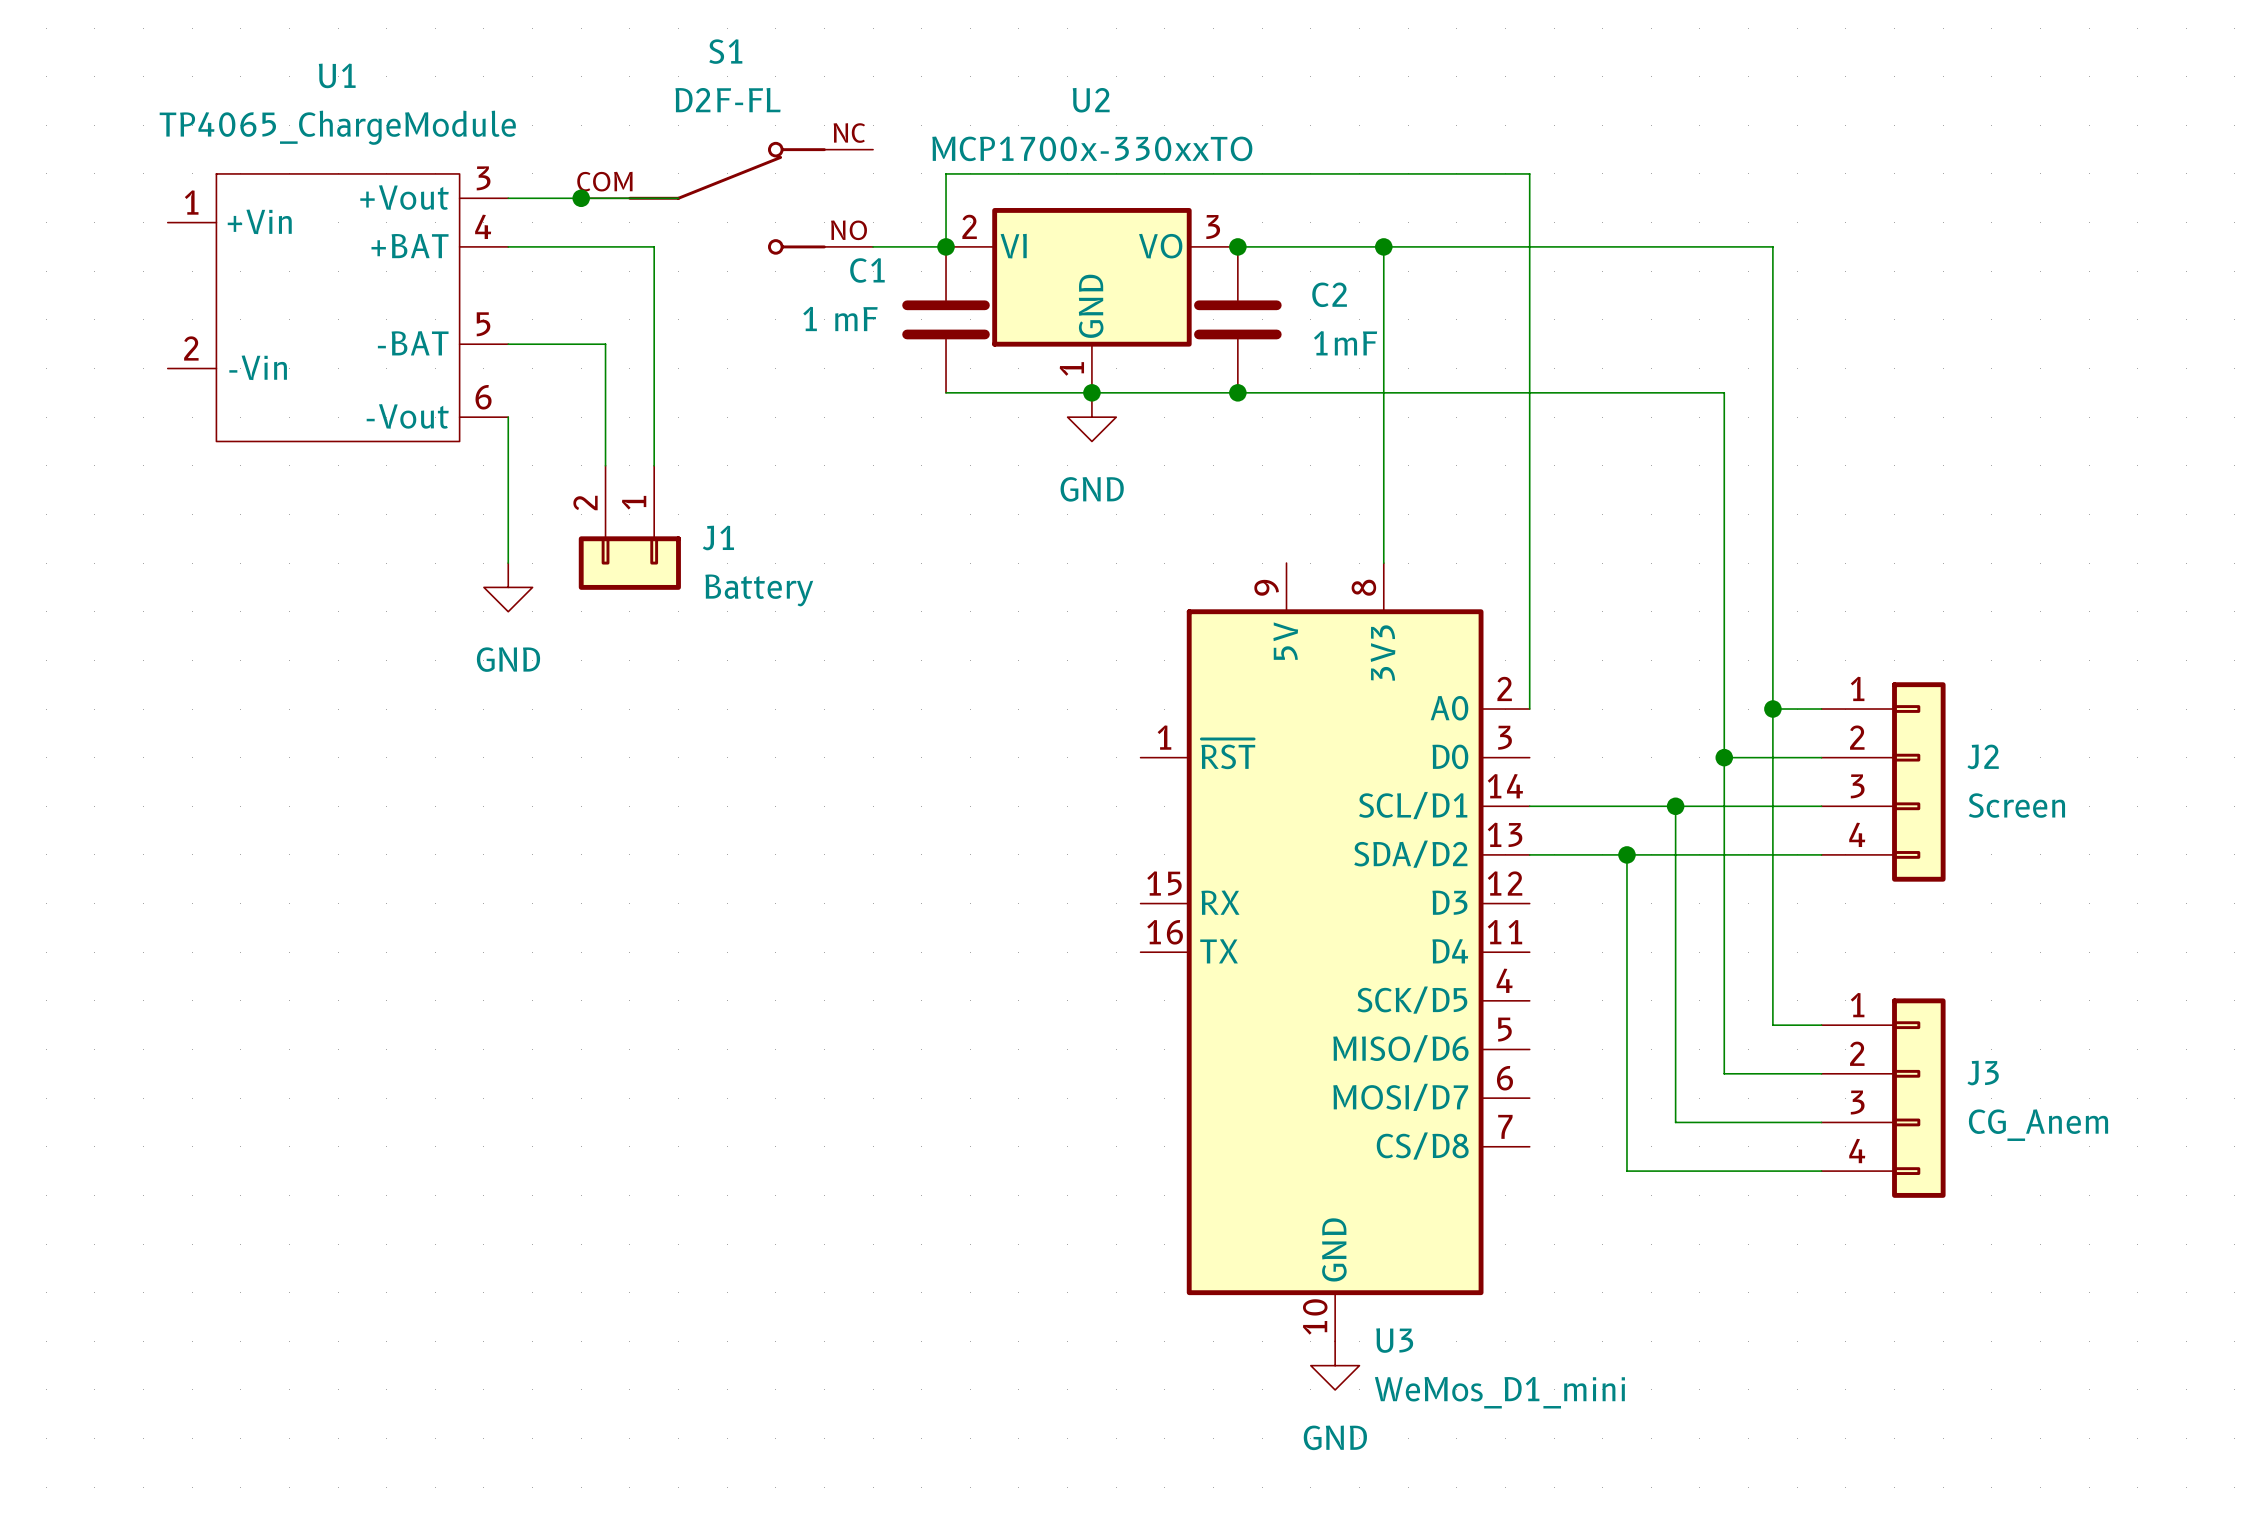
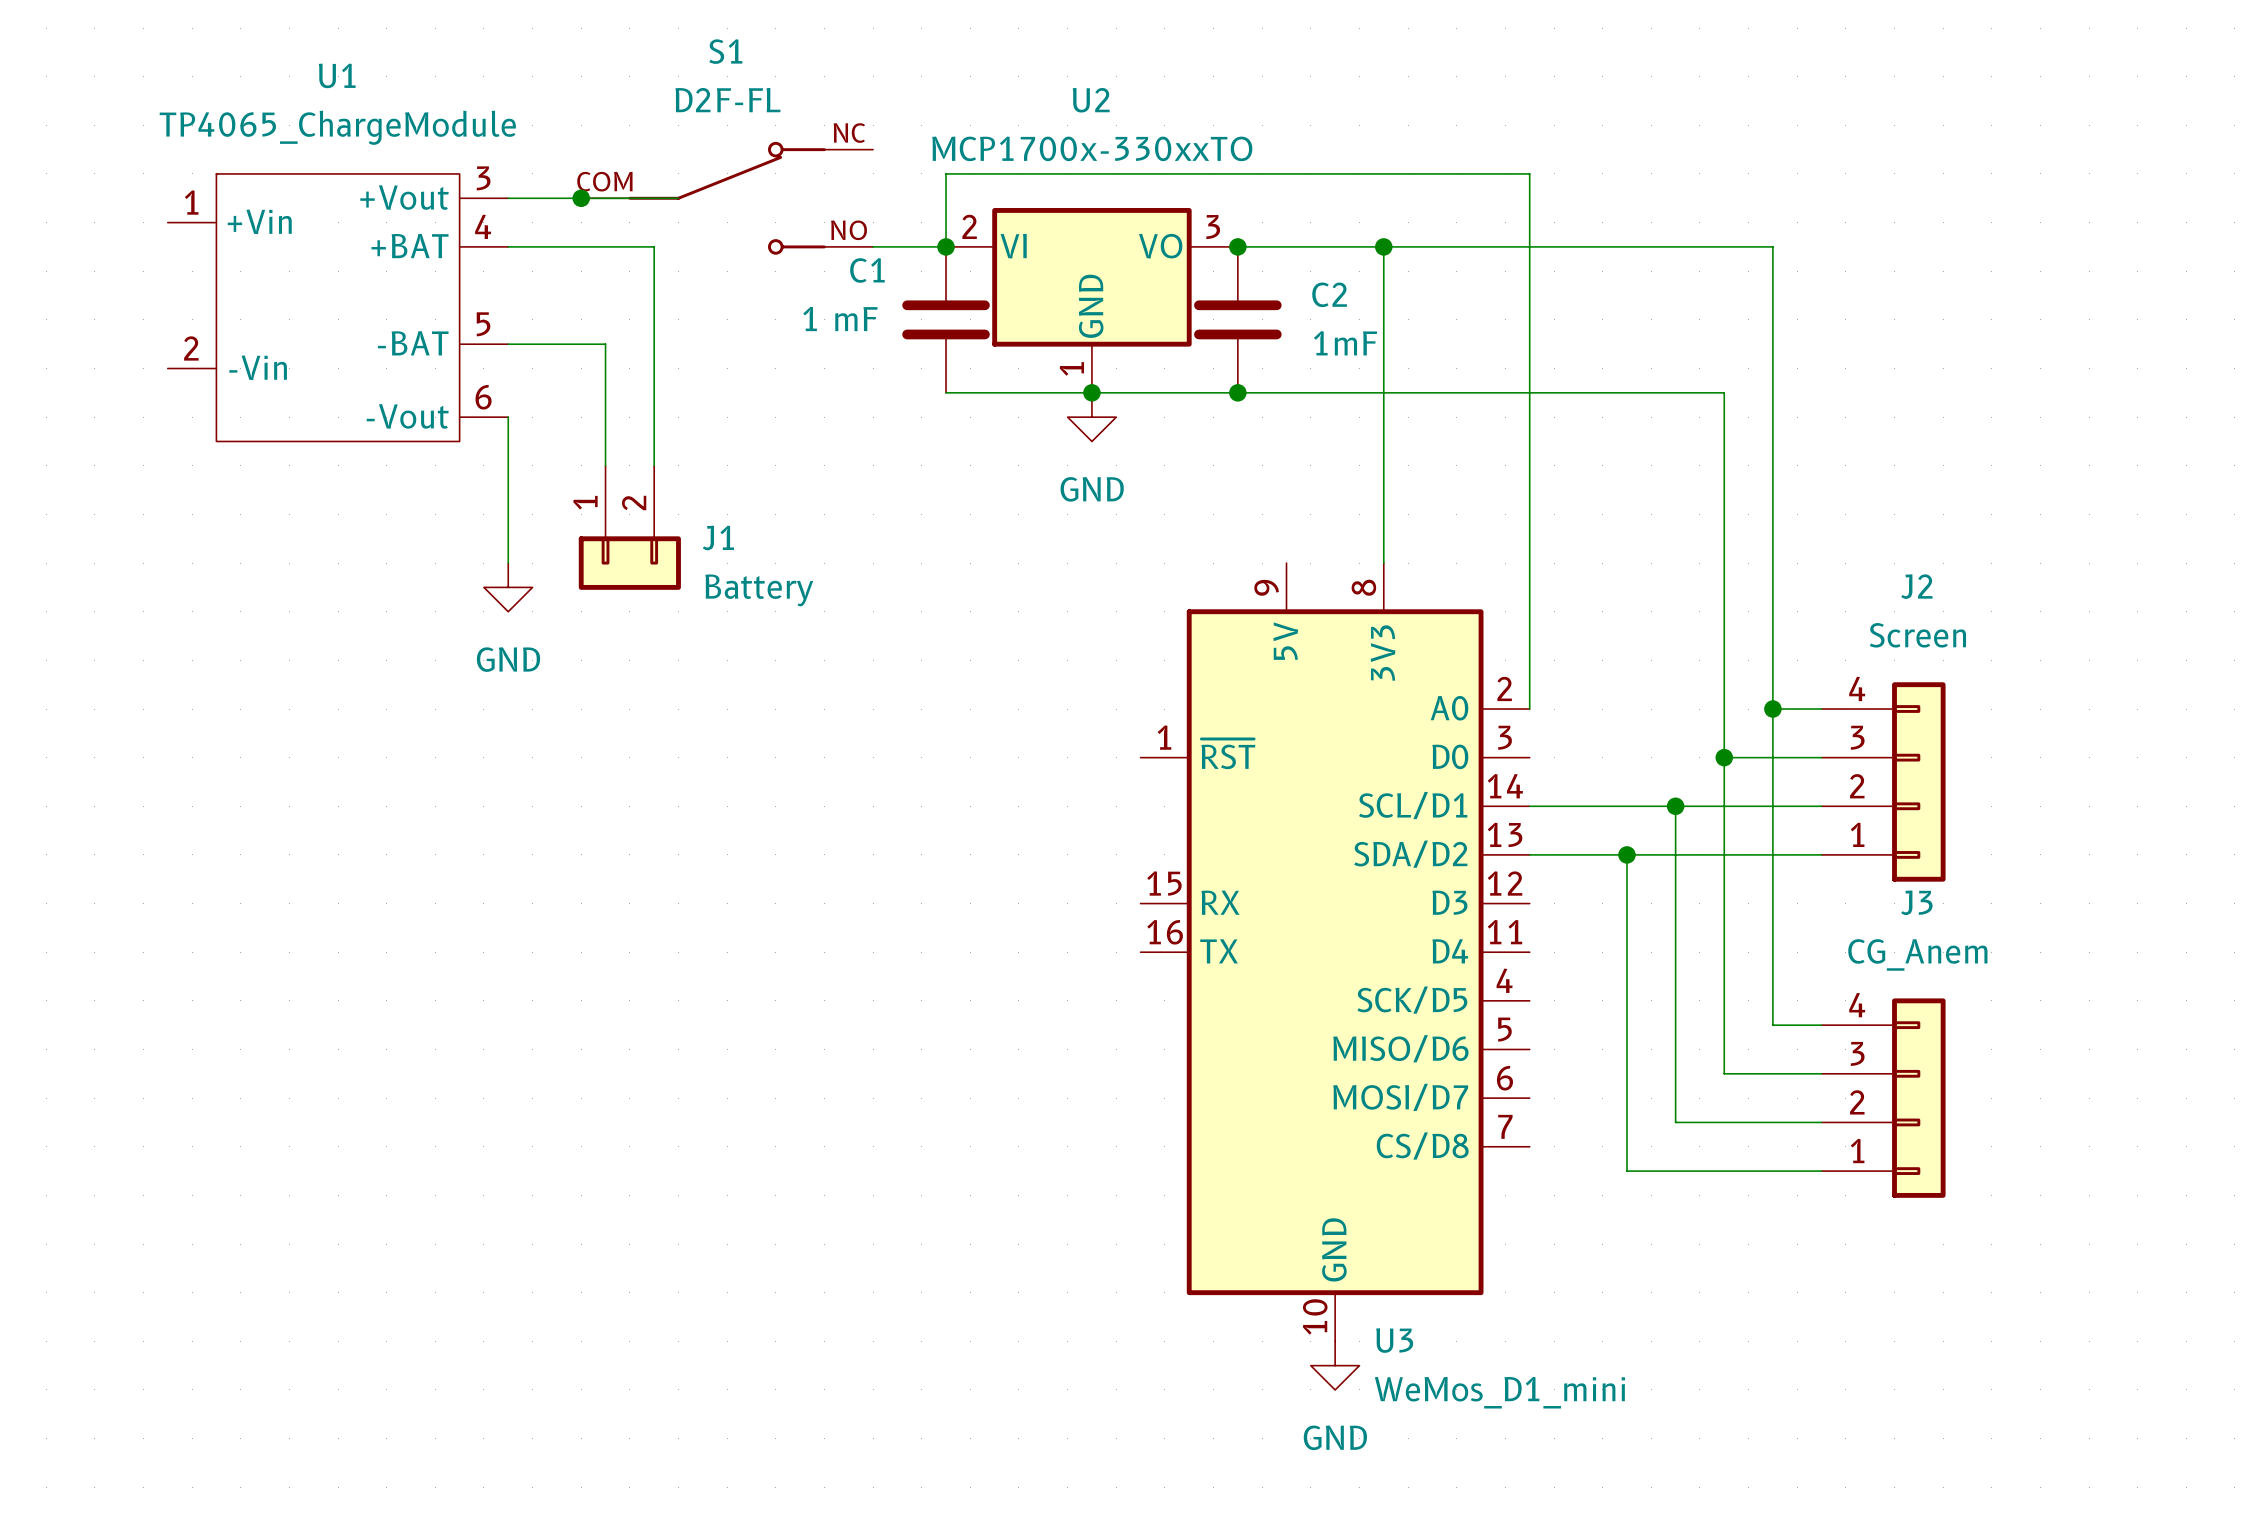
J1 flip: as is (629, 563) -> left-right (629, 563)
J2 name position: J2 (1983, 756) -> J2 (1916, 586)
J2 flip: as is (1918, 781) -> up-down (1918, 781)
J2 value position: Screen (2016, 805) -> Screen (1917, 635)
J3 name position: J3 (1983, 1073) -> J3 (1916, 902)
J3 flip: as is (1918, 1098) -> up-down (1918, 1098)
J3 value position: CG_Anem (2038, 1125) -> CG_Anem (1917, 954)

